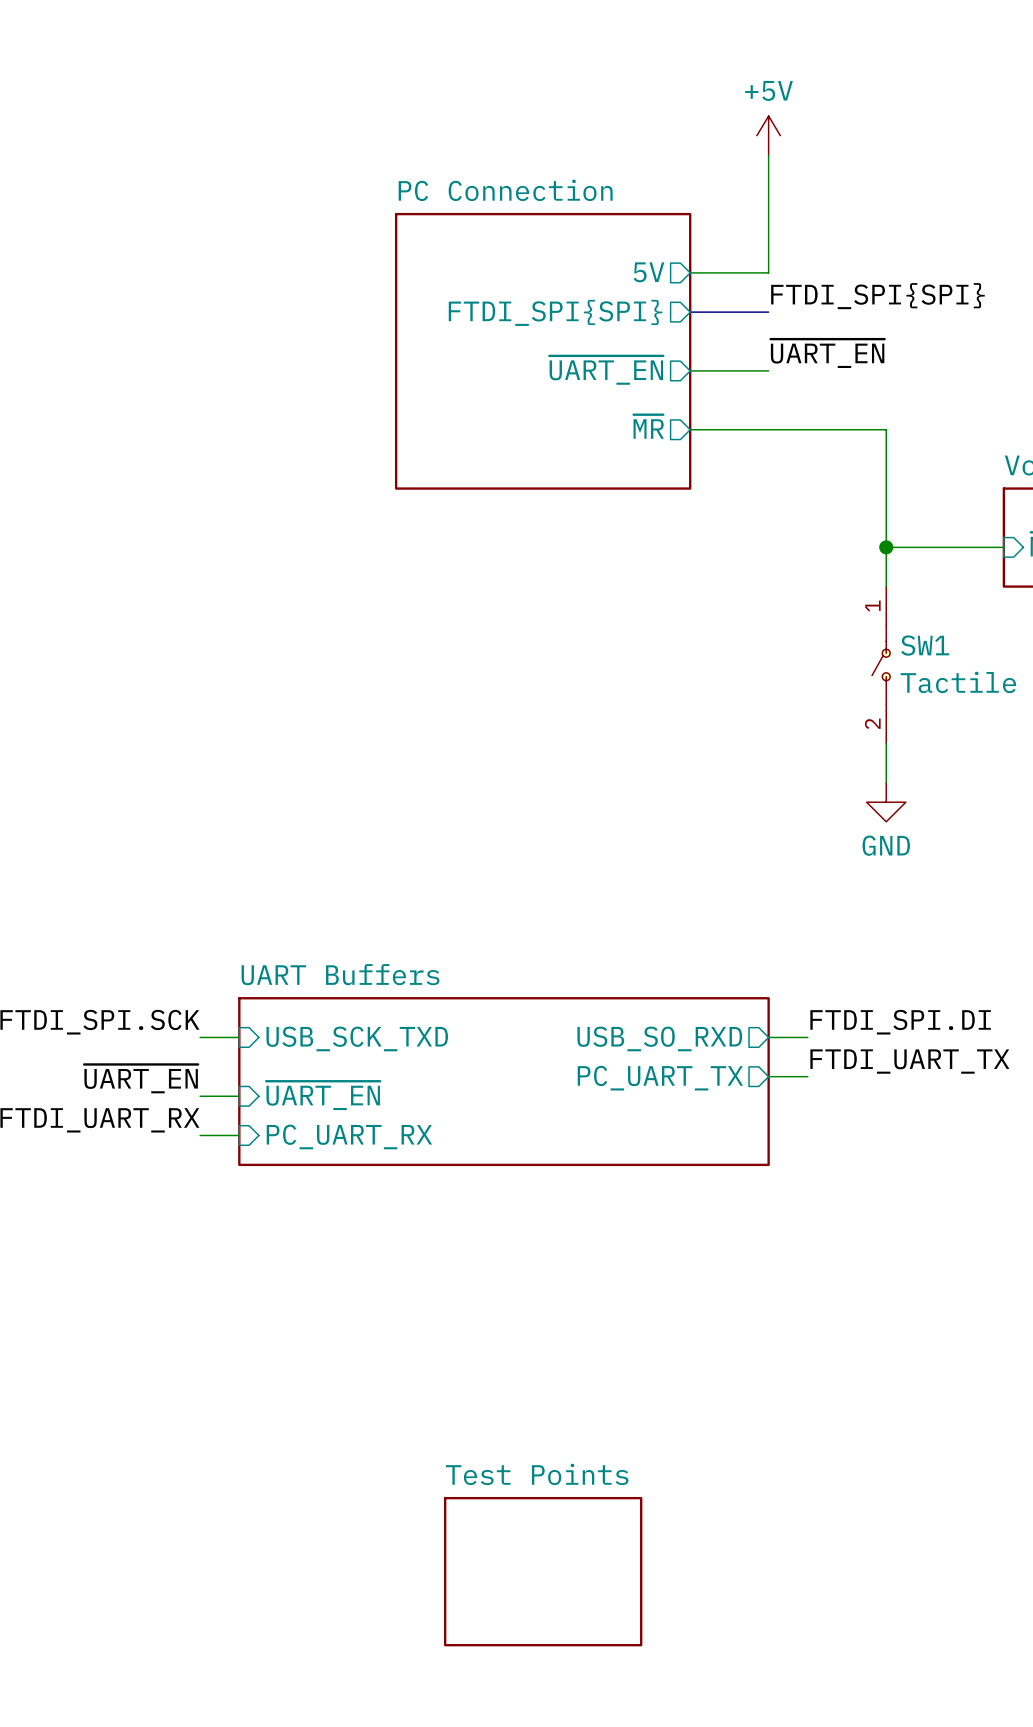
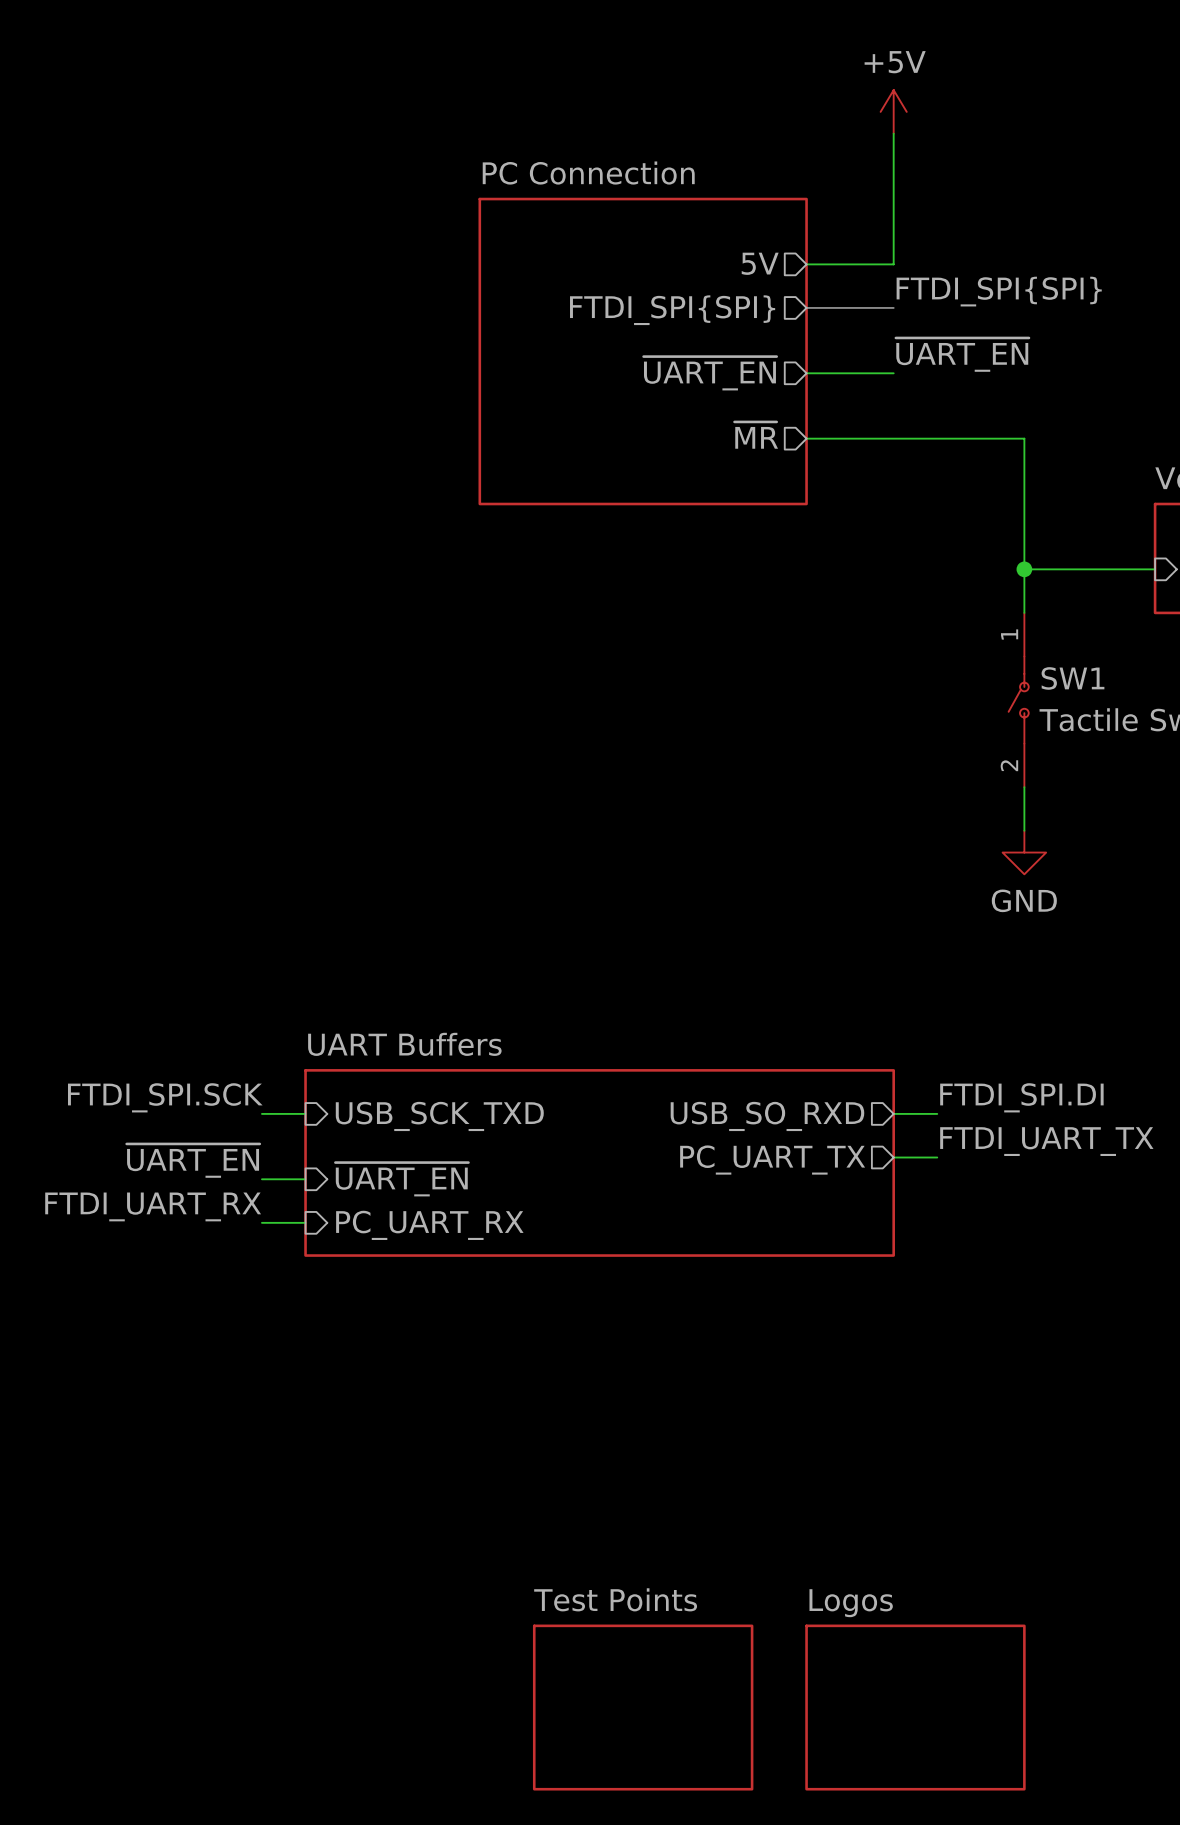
sheet Logos: none -> (915, 1707)

